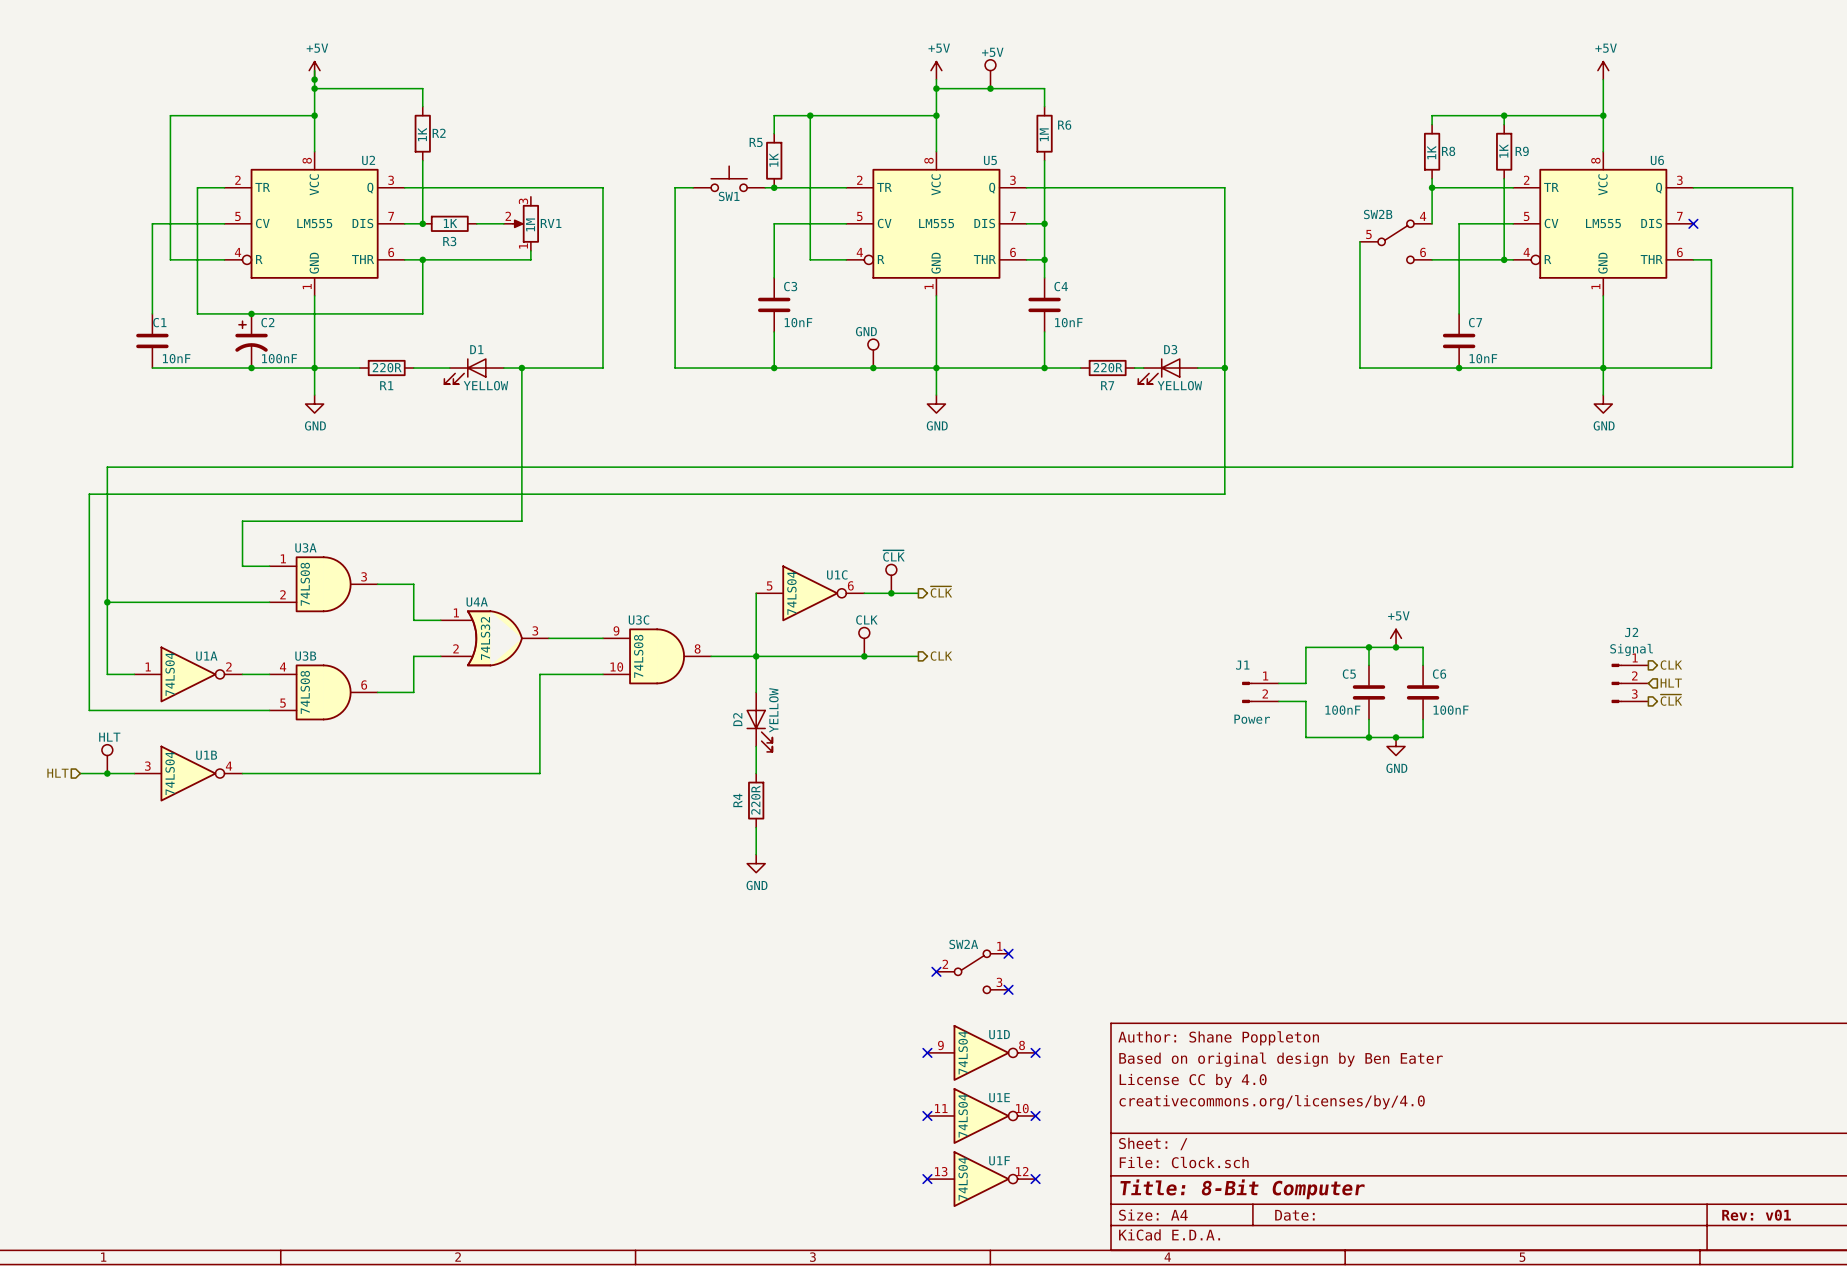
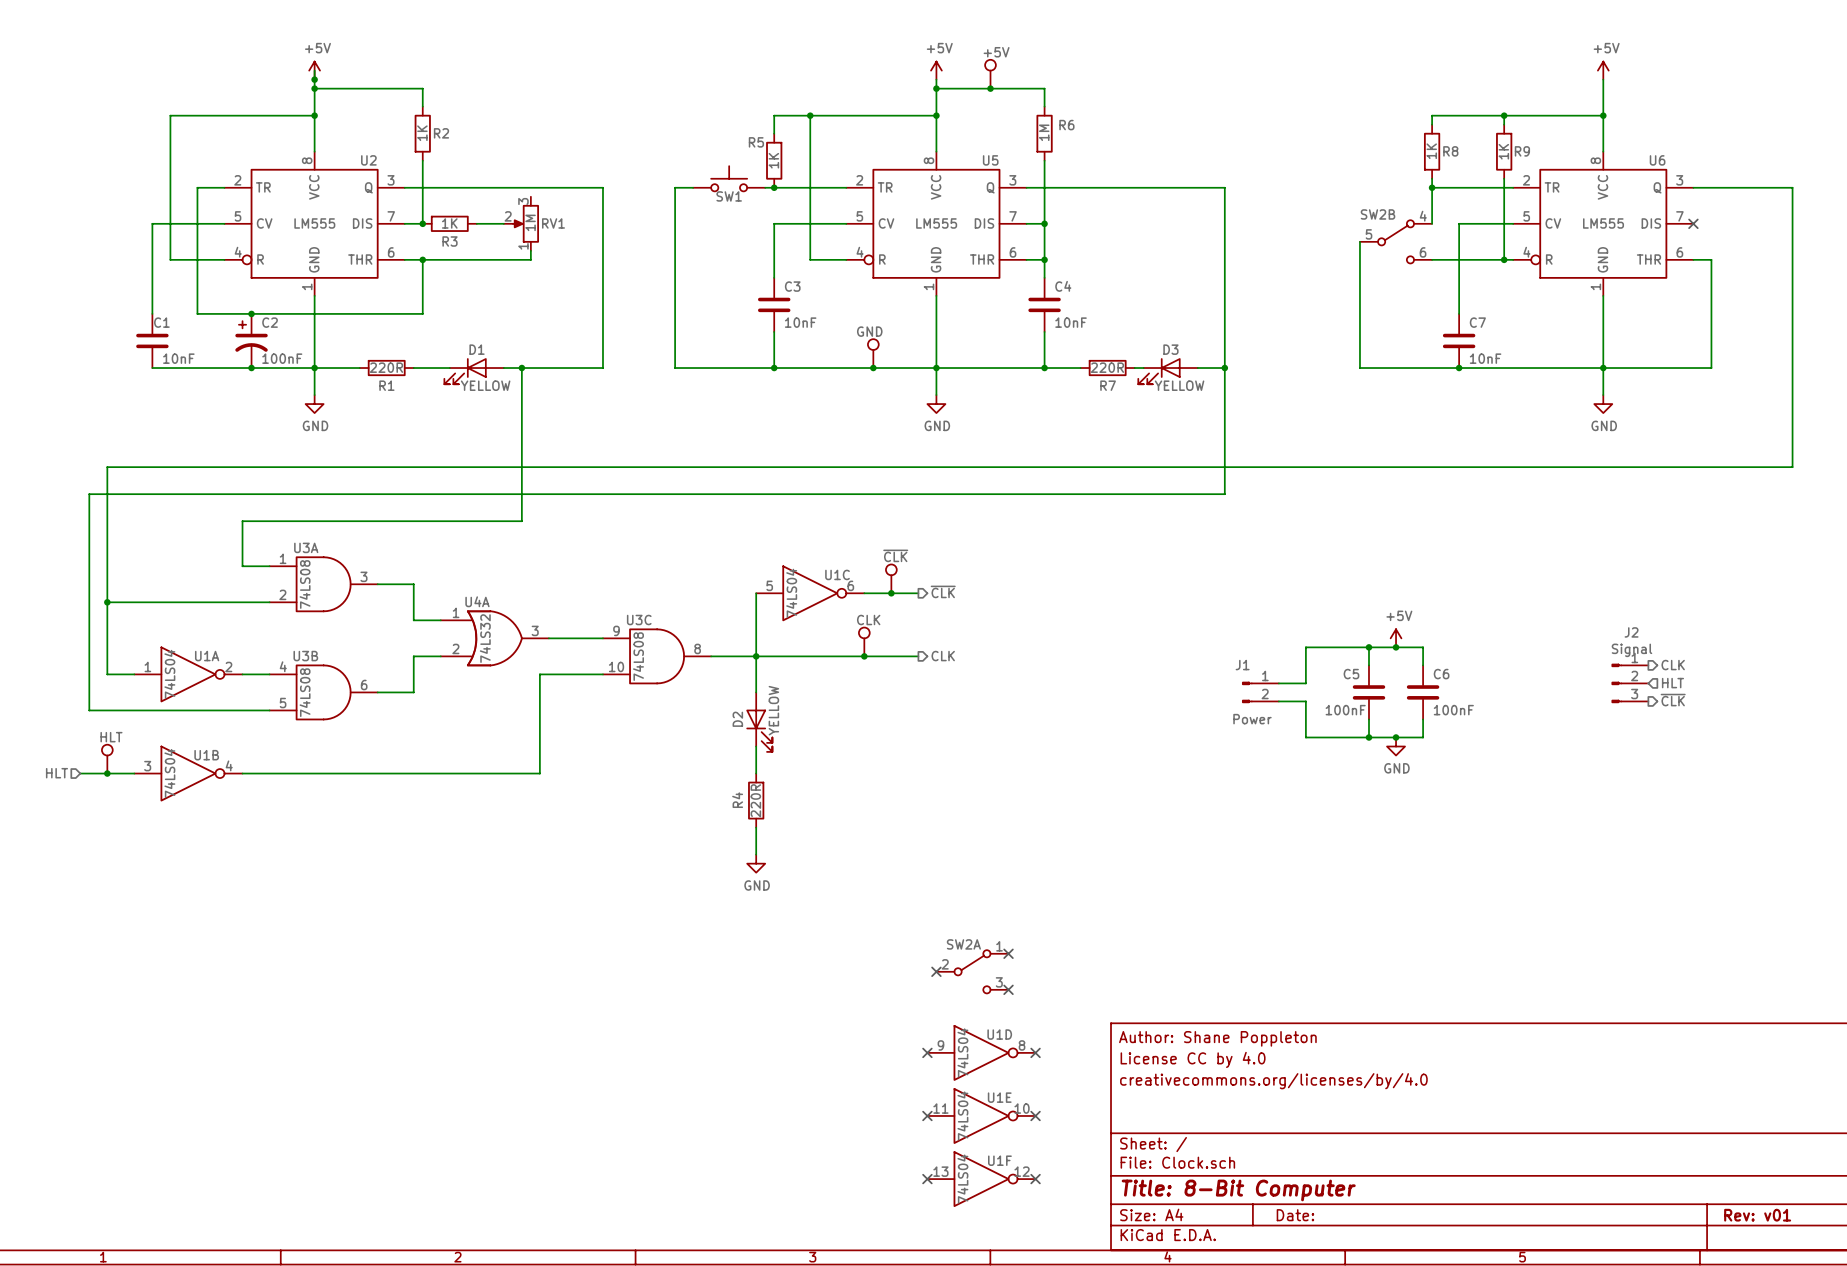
title block: Based on original design by Ben Eater (1281, 1059) -> License CC by 4.0 (1193, 1059)
title block: License CC by 4.0 (1193, 1080) -> creativecommons.org/licenses/by/4.0 (1273, 1081)
title block: creativecommons.org/licenses/by/4.0 (1272, 1102) -> none

